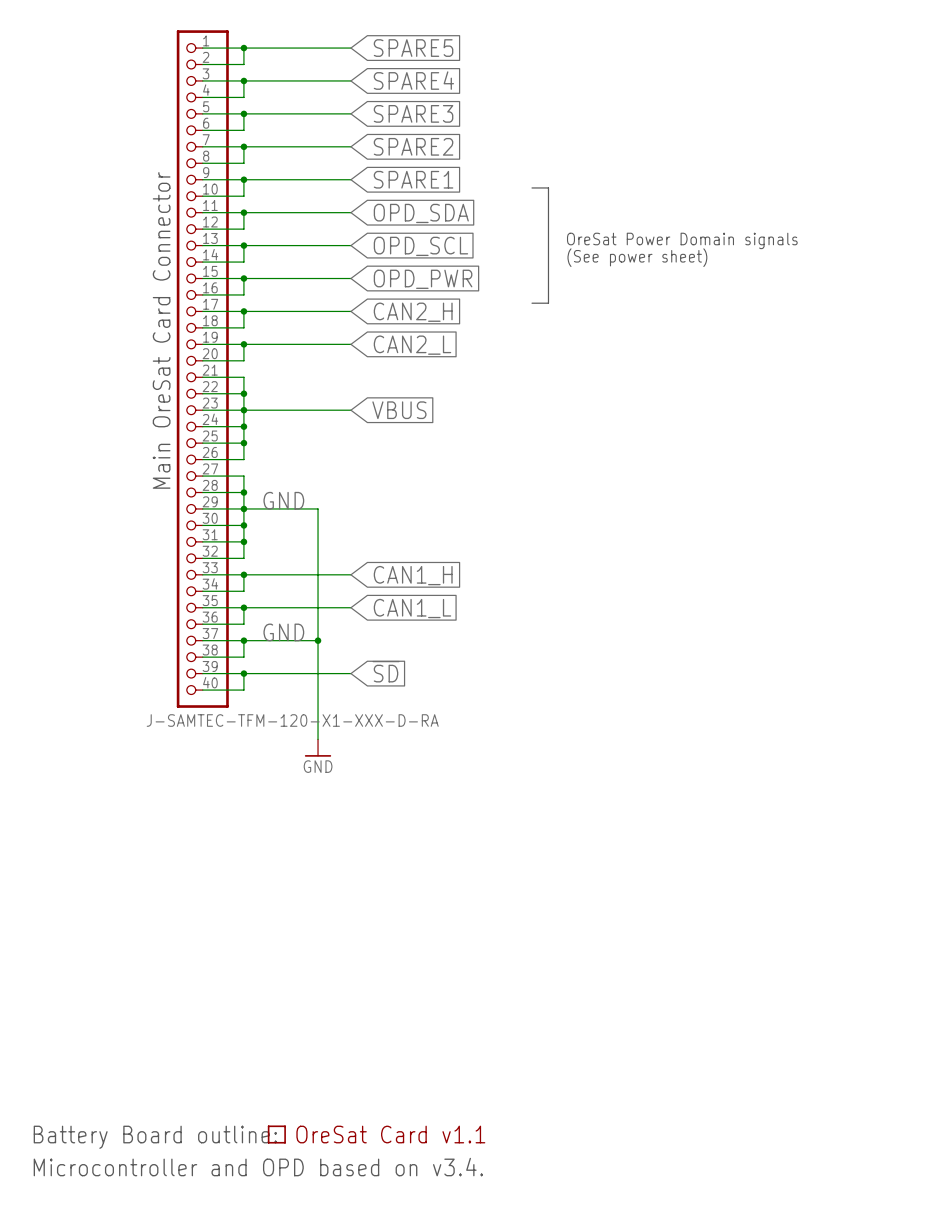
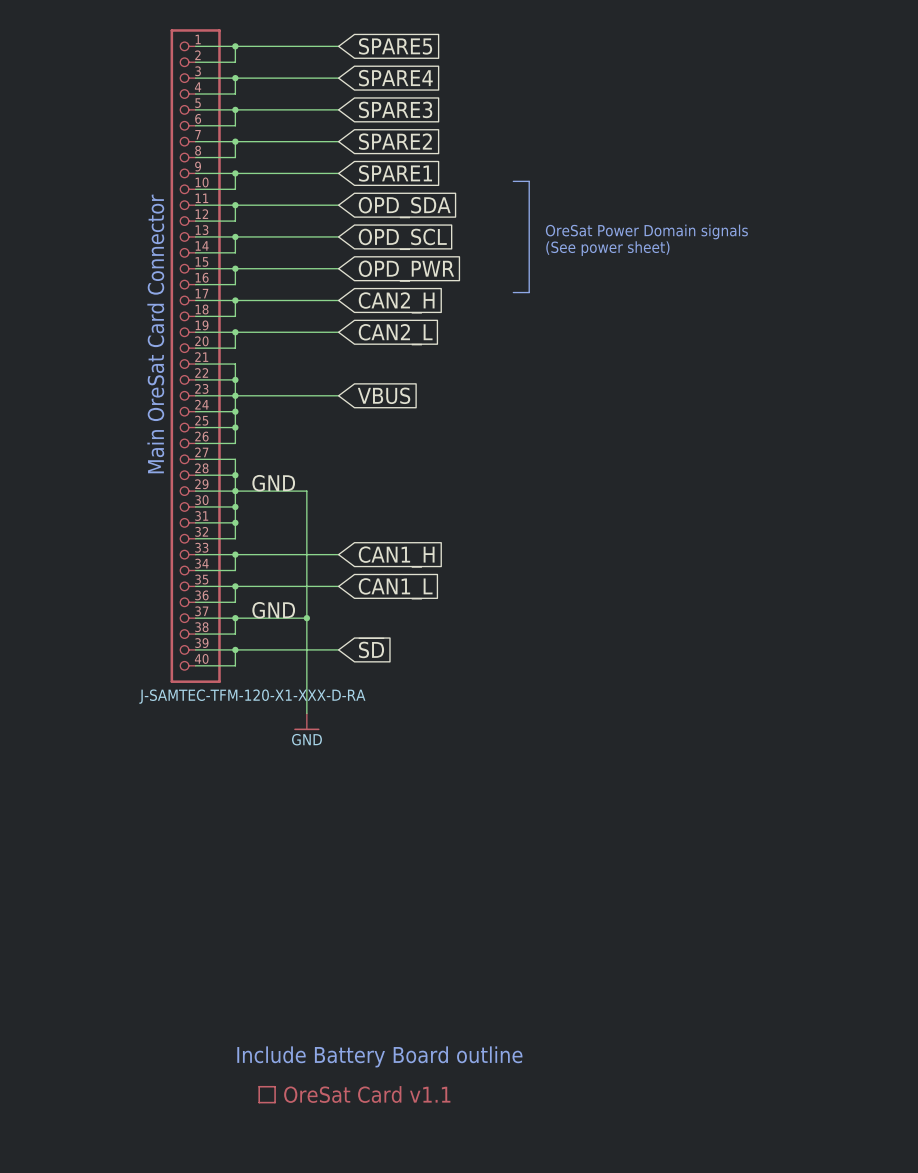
text: none -> Include Battery Board outline (379, 1056)
text: Battery Board outline: (155, 1137) -> none
text: Microcontroller and OPD based on v3.4. (258, 1167) -> none

